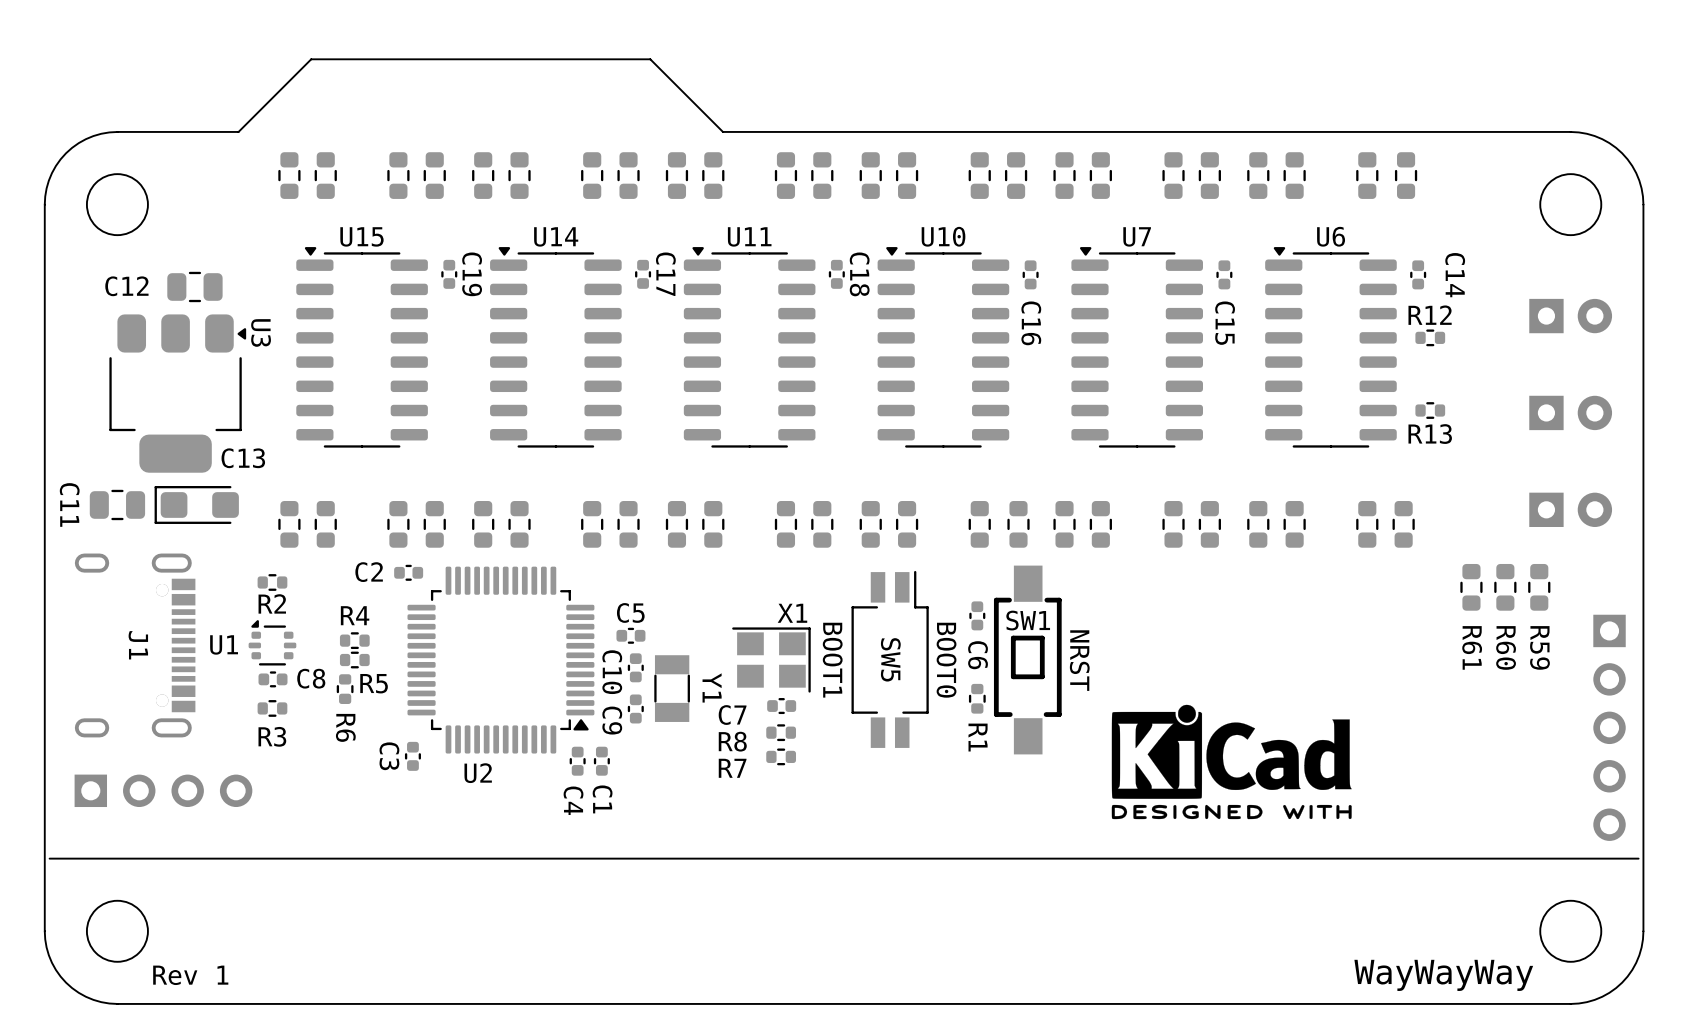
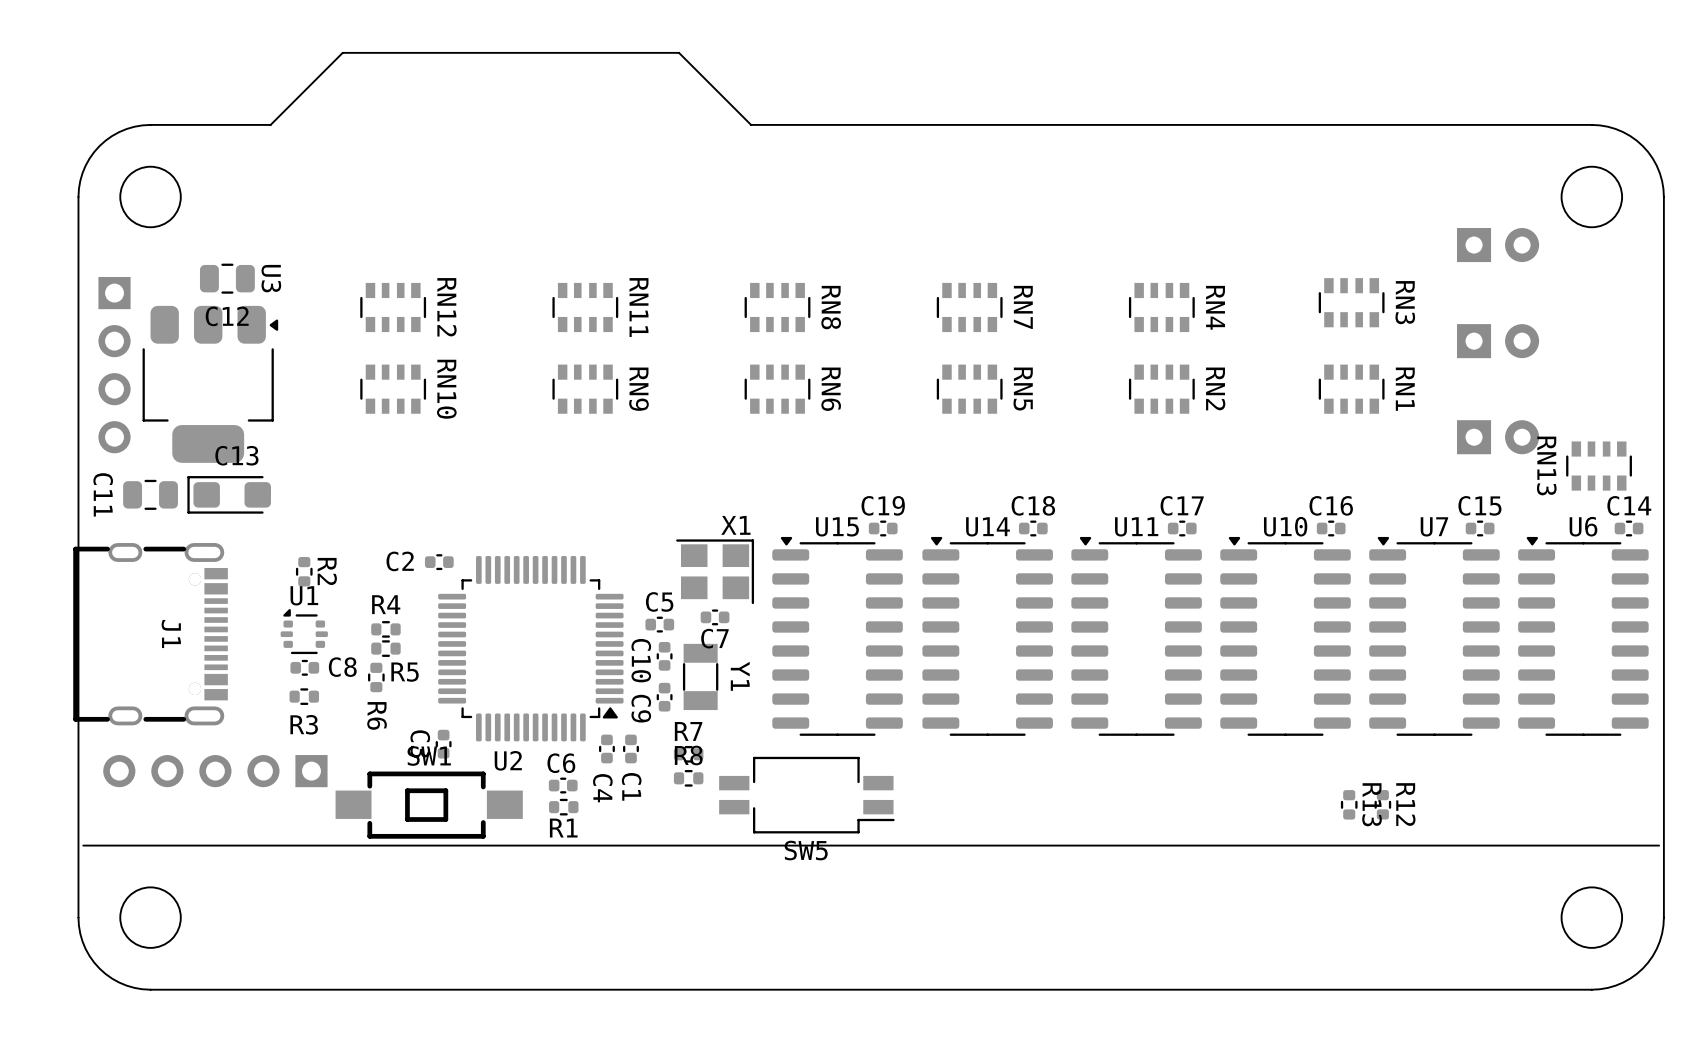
part: (289, 175) -> none
part: (325, 175) -> none
part: (398, 175) -> none
part: (434, 175) -> none
part: (483, 175) -> none
part: (519, 175) -> none
part: (592, 175) -> none
part: (628, 175) -> none
part: (676, 175) -> none
part: (713, 175) -> none
part: (785, 175) -> none
part: (822, 175) -> none
part: (870, 175) -> none
part: (907, 175) -> none
part: (979, 175) -> none
part: (1016, 175) -> none
part: (1064, 175) -> none
part: (1100, 175) -> none
part: (1173, 175) -> none
part: (1209, 175) -> none
part: (1258, 175) -> none
part: (1294, 175) -> none
part: (1367, 175) -> none
part: (1406, 175) -> none
part: none -> (1498, 245)
C19 rotation: 0° (449, 274) -> 90° clockwise (883, 528)
C19 position: (449, 274) -> (883, 528)
C17 rotation: 0° (643, 274) -> 90° clockwise (1182, 528)
C17 position: (643, 274) -> (1182, 528)
C18 rotation: 0° (836, 274) -> 90° clockwise (1033, 528)
C18 position: (836, 274) -> (1033, 528)
C16 rotation: 0° (1030, 274) -> 90° clockwise (1331, 528)
C16 position: (1030, 274) -> (1331, 528)
C15 rotation: 0° (1224, 274) -> 90° clockwise (1480, 528)
C15 position: (1224, 274) -> (1480, 528)
C14 rotation: 0° (1418, 274) -> 90° clockwise (1629, 528)
C14 position: (1418, 274) -> (1629, 528)
C14 name position: C14 (1455, 275) -> C14 (1629, 505)
C12 name position: C12 (126, 286) -> C12 (227, 316)
RN3: none -> (1351, 302)
RN12: none -> (393, 307)
RN11: none -> (585, 307)
RN8: none -> (777, 307)
RN7: none -> (969, 307)
RN4: none -> (1161, 307)
part: (1570, 316) -> none
C16 name position: C16 (1031, 323) -> C16 (1331, 505)
C15 name position: C15 (1225, 323) -> C15 (1479, 505)
U3 name position: U3 (261, 332) -> U3 (271, 278)
R12 rotation: 0° (1430, 337) -> 90° clockwise (1382, 804)
R12 position: (1430, 337) -> (1382, 804)
U15 position: (362, 347) -> (837, 636)
U14 position: (555, 347) -> (987, 636)
U11 position: (749, 347) -> (1136, 636)
U10 position: (943, 347) -> (1285, 636)
U7 position: (1137, 347) -> (1434, 636)
U6 position: (1330, 347) -> (1583, 636)
part: none -> (1498, 341)
RN10: none -> (393, 389)
RN9: none -> (585, 389)
RN6: none -> (777, 389)
RN5: none -> (969, 389)
RN2: none -> (1161, 389)
RN1: none -> (1351, 389)
R13 rotation: 0° (1430, 410) -> 90° clockwise (1349, 804)
R13 position: (1430, 410) -> (1349, 804)
part: (1570, 412) -> none
part: none -> (1498, 437)
C13 name position: C13 (243, 458) -> C13 (236, 455)
RN13: none -> (1599, 466)
part: (1570, 509) -> none
part: (289, 524) -> none
part: (325, 524) -> none
part: (398, 524) -> none
part: (434, 524) -> none
part: (483, 524) -> none
part: (519, 524) -> none
part: (592, 524) -> none
part: (628, 524) -> none
part: (676, 524) -> none
part: (713, 524) -> none
part: (785, 524) -> none
part: (822, 524) -> none
part: (870, 524) -> none
part: (907, 524) -> none
part: (979, 524) -> none
part: (1018, 524) -> none
part: (1064, 524) -> none
part: (1100, 524) -> none
part: (1173, 524) -> none
part: (1209, 524) -> none
part: (1258, 524) -> none
part: (1294, 524) -> none
part: (1367, 524) -> none
part: (1403, 524) -> none
J1 footprint: [74, 553, 196, 738] -> [73, 543, 228, 726]
R2 rotation: 0° (272, 582) -> 90° clockwise (304, 571)
R61: (1471, 587) -> none
R60: (1505, 587) -> none
R59: (1539, 587) -> none
C6 rotation: 0° (977, 615) -> 90° clockwise (563, 785)
C6 position: (977, 615) -> (563, 785)
U1 name position: U1 (224, 644) -> U1 (304, 595)
C6 name position: C6 (978, 655) -> C6 (561, 763)
SW5 rotation: 0° (890, 659) -> 90° clockwise (806, 795)
SW5 position: (890, 659) -> (806, 795)
SW5 name position: SW5 (890, 659) -> SW5 (806, 850)
X1 position: (771, 660) -> (715, 571)
text: BOOT1 (832, 660) -> none
text: BOOT0 (946, 660) -> none
SW1 rotation: 0° (1027, 660) -> 90° counterclockwise (429, 805)
SW1 position: (1027, 660) -> (429, 805)
text: NRST (1079, 660) -> none
R1 rotation: 0° (977, 698) -> 90° clockwise (563, 807)
R1 position: (977, 698) -> (563, 807)
drawing: [1111, 704, 1352, 820] -> none
C7 position: (781, 706) -> (715, 617)
C7 name position: C7 (732, 715) -> C7 (714, 638)
part: (1609, 727) -> none
R8 position: (781, 732) -> (688, 778)
R8 name position: R8 (732, 741) -> R8 (688, 755)
R7 position: (781, 756) -> (688, 754)
R7 name position: R7 (732, 768) -> R7 (688, 731)
part: none -> (215, 771)
part rotation: 0° (163, 790) -> 90° clockwise (114, 365)
part position: (163, 790) -> (114, 365)
text: Rev 1 (190, 975) -> none
text: WayWayWay (1443, 975) -> none

